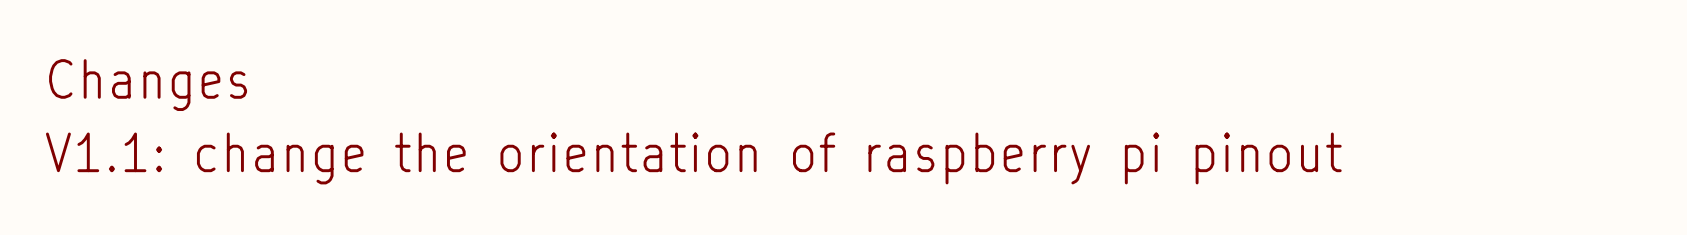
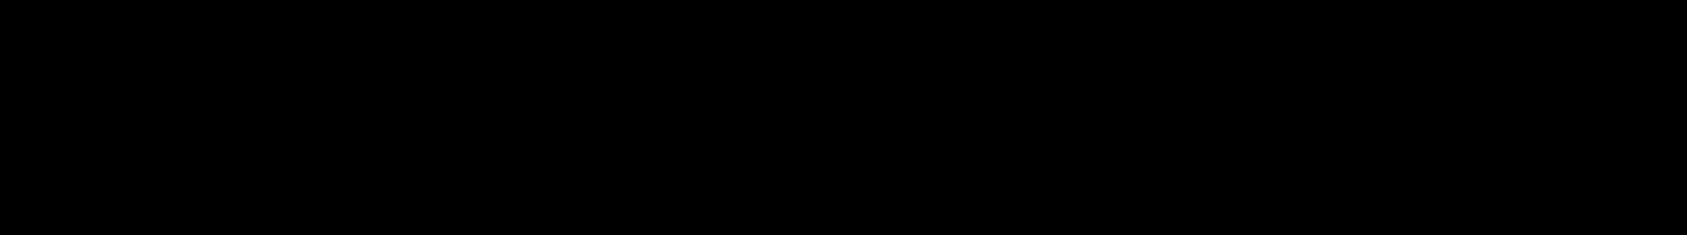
text: Changes (148, 85) -> none
text: V1.1: change the orientation of raspberry pi pinout (693, 158) -> none

